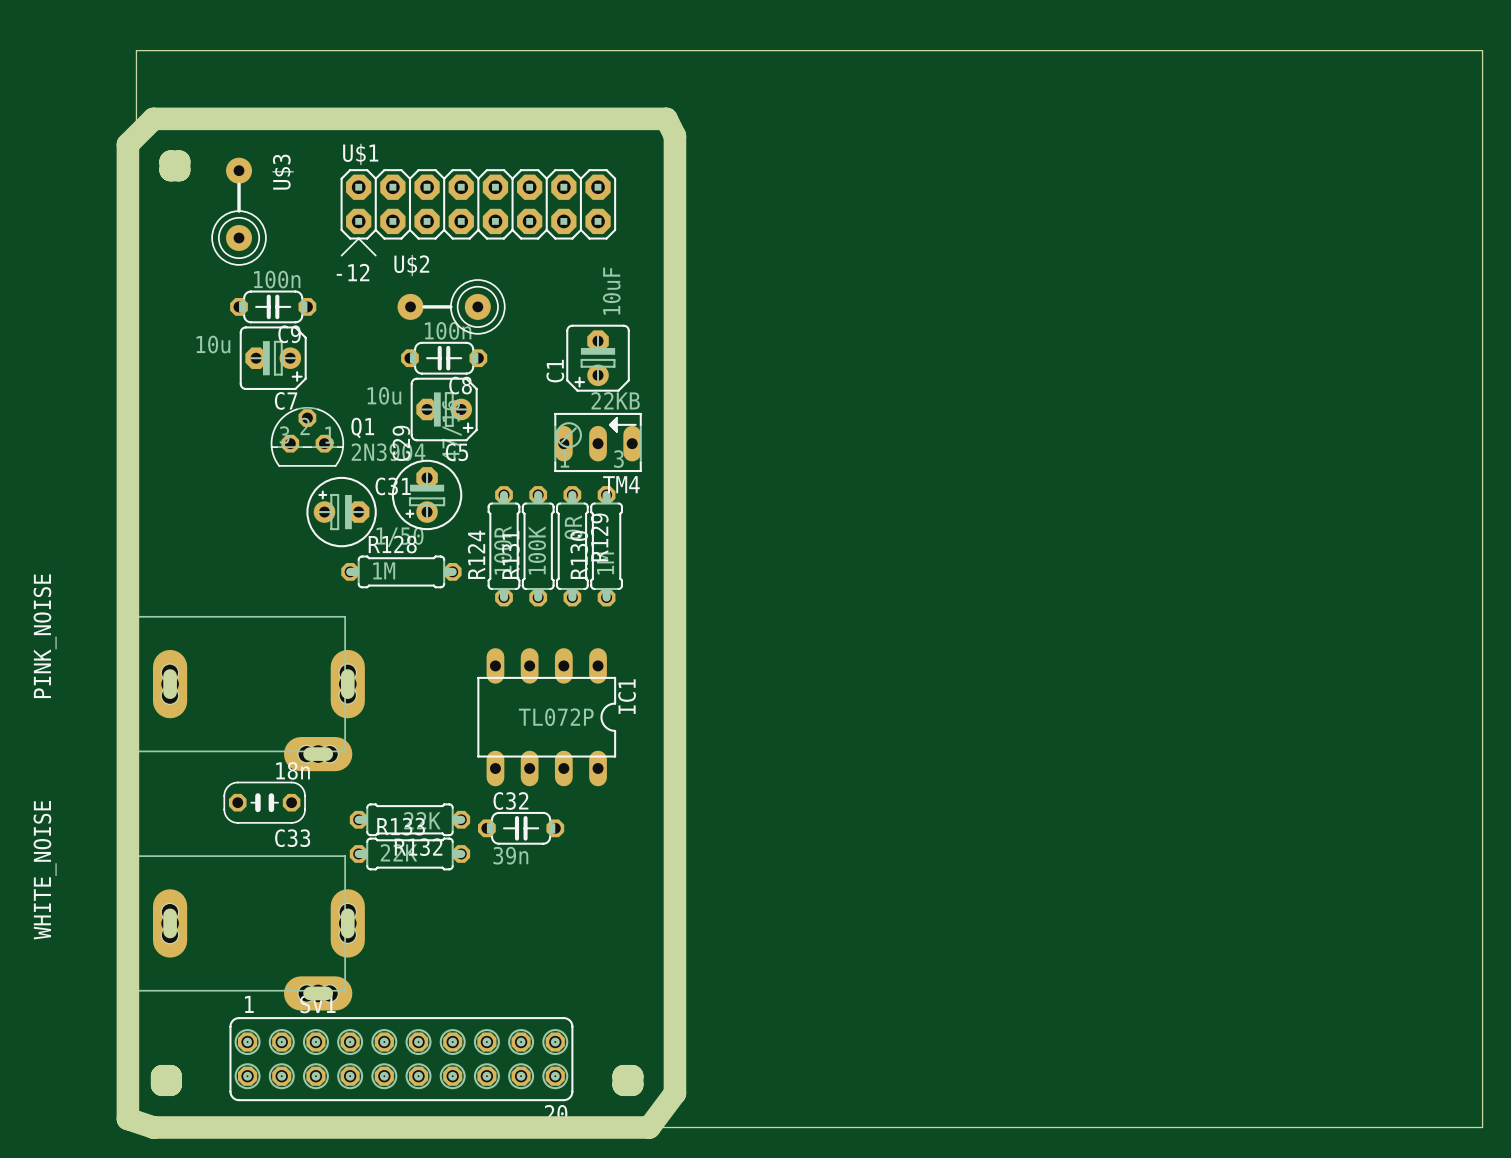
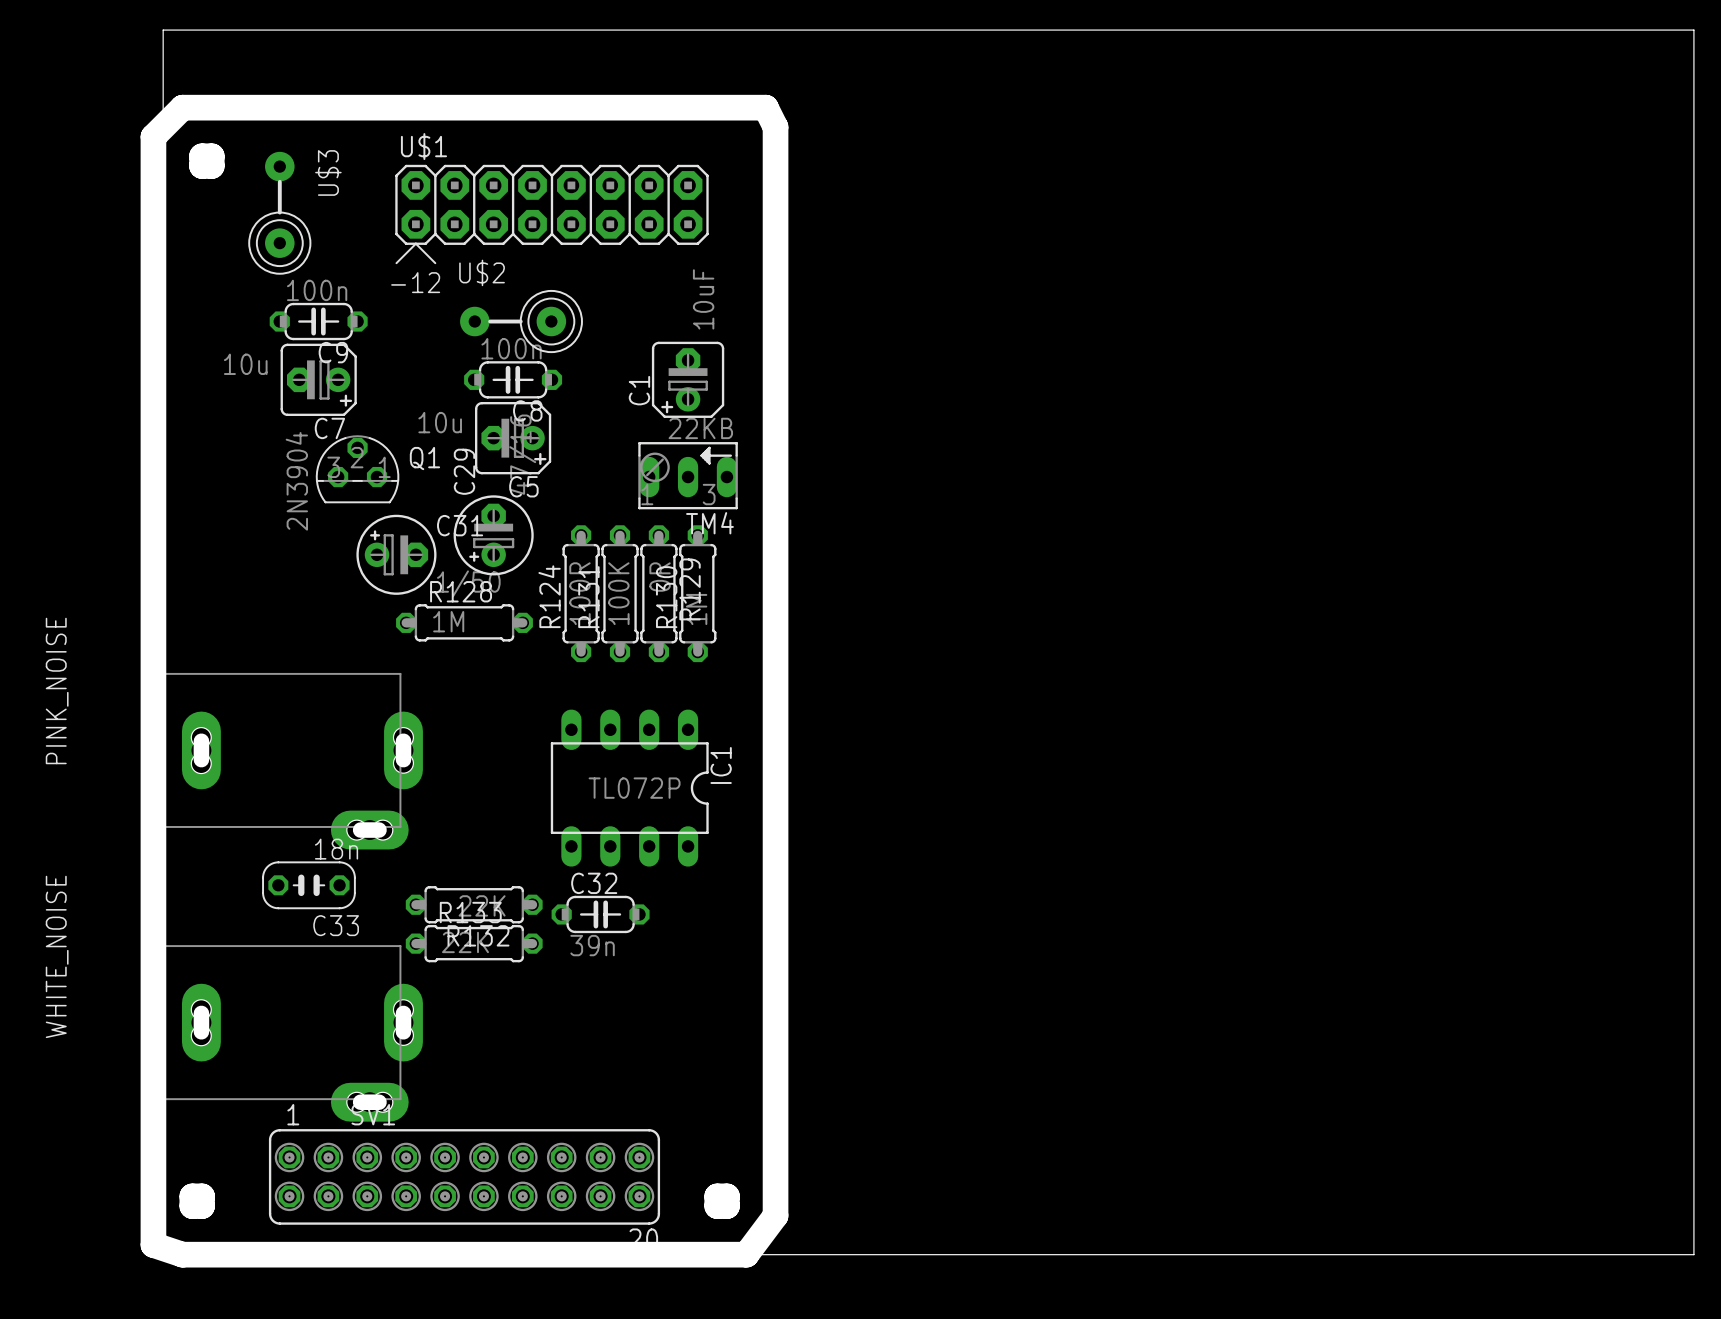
Q1 value rotation: 0° (388, 452) -> 90° counterclockwise (296, 481)
Q1 value position: 2N3904 (388, 452) -> 2N3904 (296, 481)

